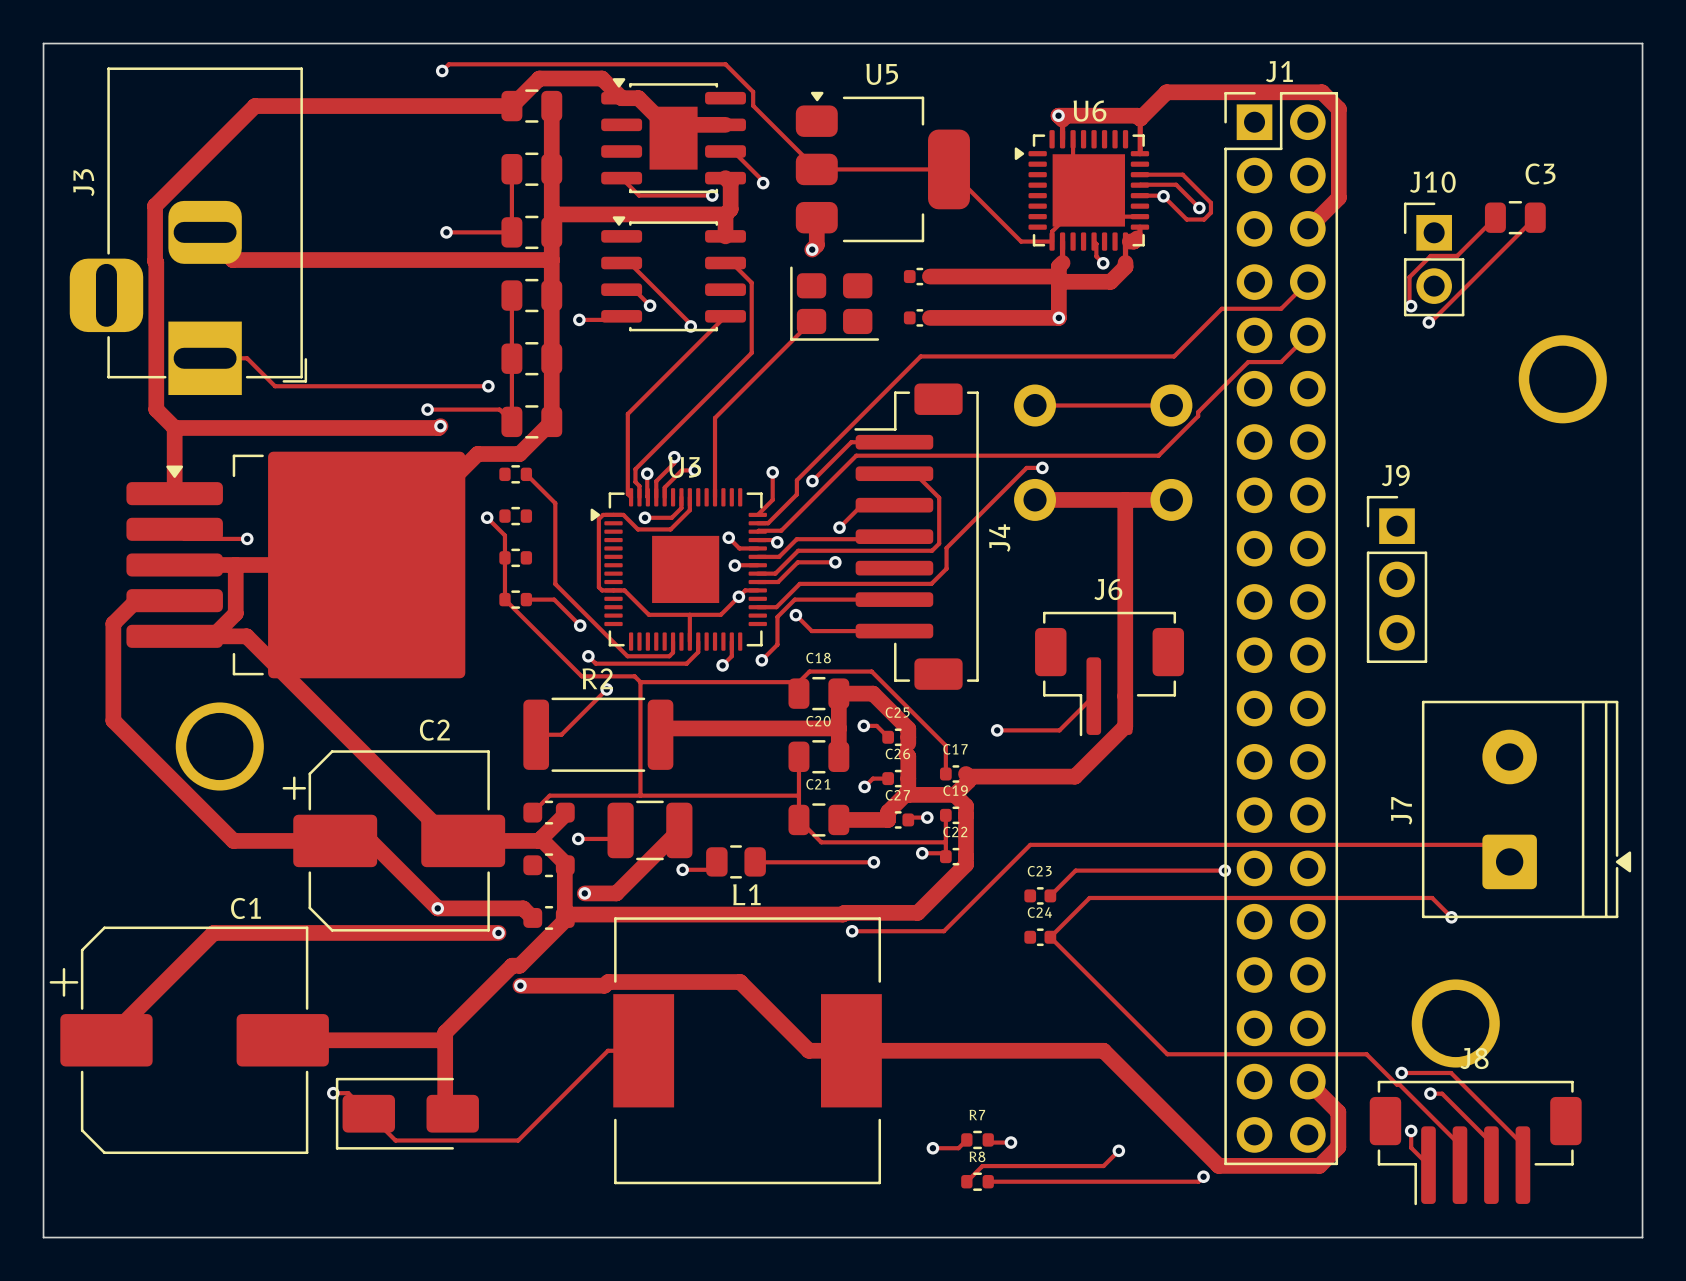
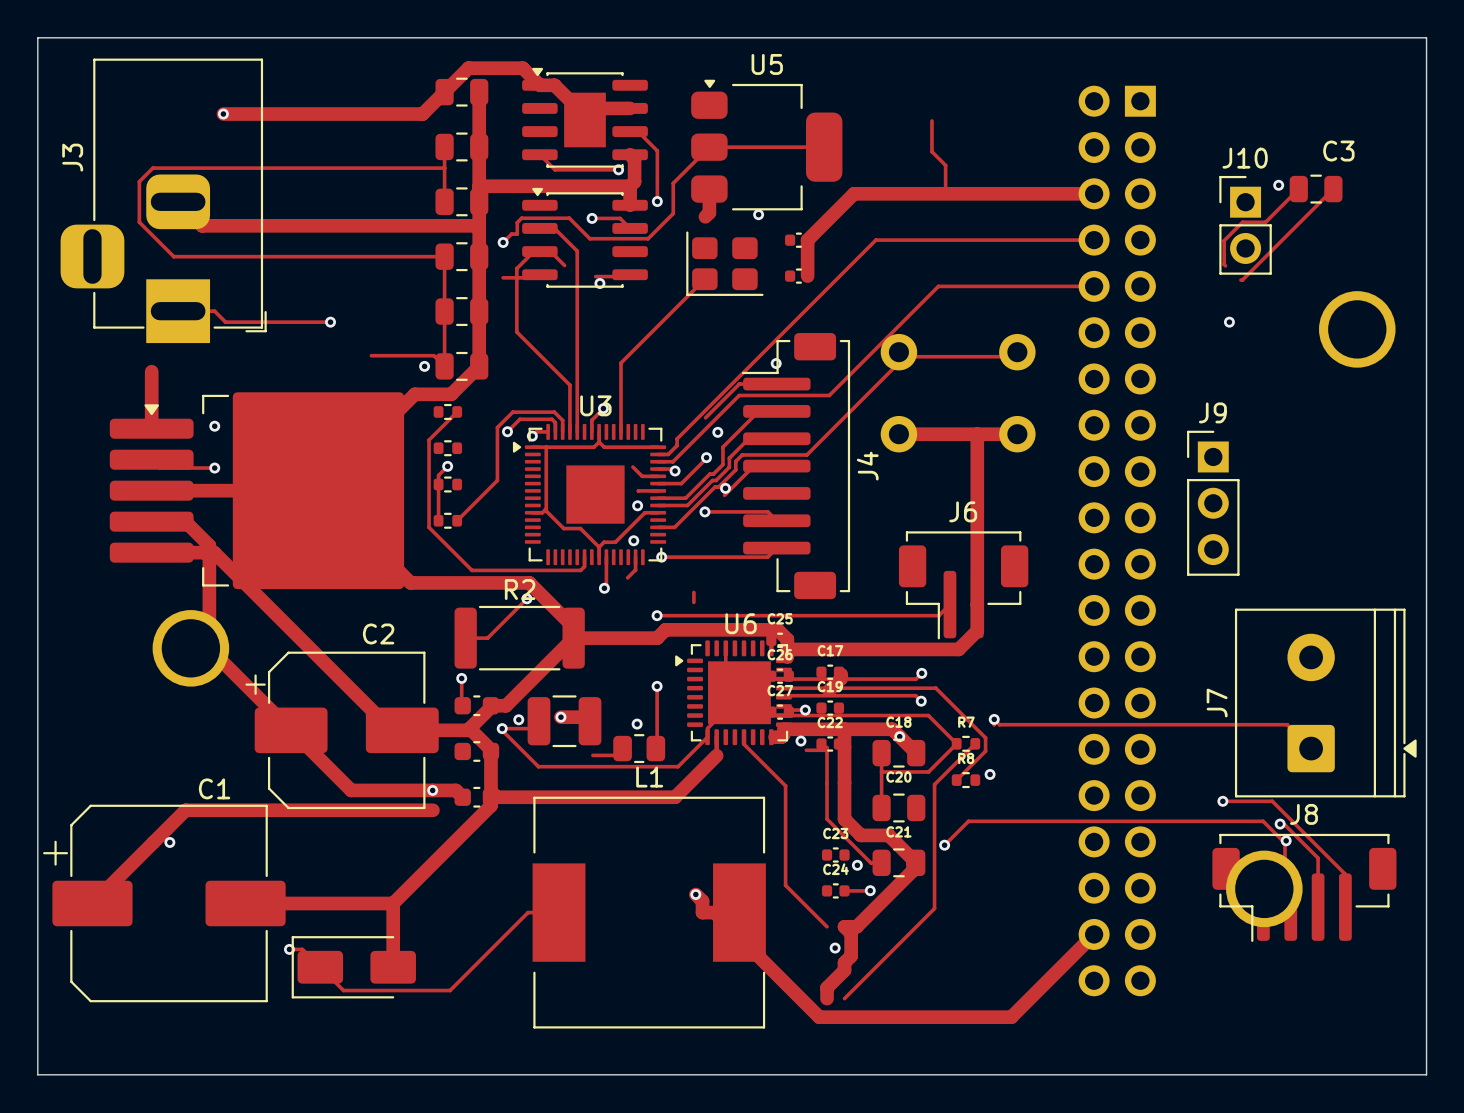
track: (442, 70) (448, 64) (725, 64) (753, 91) (753, 105) (816, 169) -> (503, 242) (511, 234) (517, 234) (517, 222) (521, 218) (569, 218) (589, 238) (648, 238) (673, 213) (673, 183) (709, 147)
via: (442, 70) -> none
track: (511, 106) (254, 106) (155, 205) (156, 409) (174, 427) (438, 427) (440, 426) -> (444, 92) (422, 114) (223, 114)
via: (1058, 115) -> none
track: (1140, 118) (1166, 92) (1322, 92) (1338, 109) (1338, 197) (1307, 228) -> none
track: (1140, 118) (1137, 115) (1058, 115) (1062, 119) (1062, 139) -> none
track: (1140, 118) (1140, 153) -> none
via: none -> (223, 114)
track: (733, 151) (763, 183) -> (636, 131) (657, 150) (657, 201)
track: (949, 169) (1021, 241) (1052, 241) (1052, 231) (1067, 216) (1139, 216) -> none
track: (1139, 174) (1182, 174) (1210, 202) (1210, 212) (1204, 219) (1186, 219) (1162, 195) (1139, 195) -> none
via: (763, 183) -> none
track: (1139, 185) (1176, 184) (1199, 207) -> none
U6 position: (1081, 190) -> (733, 692)
track: none -> (444, 168) (152, 168) (139, 181) (139, 222) (173, 256) (444, 256)
via: (1163, 196) -> none
via: (1199, 207) -> none
via: none -> (1278, 185)
track: (1139, 227) (1139, 235) (1137, 238) (1133, 241) (1125, 241) (1125, 266) (1110, 281) (1058, 281) -> none
track: (446, 232) (511, 232) -> none
via: (446, 232) -> none
via: none -> (657, 201)
track: (1062, 241) (1062, 262) (1058, 266) (1058, 317) (929, 317) -> (1094, 193) (854, 193) (807, 240) (807, 276)
track: (1094, 241) (1096, 243) (1096, 256) (1103, 263) -> none
via: none -> (758, 214)
via: (812, 249) -> none
via: none -> (592, 218)
track: (629, 263) (690, 324) (690, 326) -> (546, 228) (554, 228) (577, 251) (577, 423)
track: (725, 263) (731, 263) (751, 282) (751, 352) (635, 469) (635, 482) (639, 486) -> (630, 228) (620, 218) (592, 218)
via: (1103, 263) -> none
track: (929, 276) (1058, 276) -> none
via: none -> (503, 242)
track: (1307, 282) (1281, 308) (1221, 308) (1174, 356) (920, 356) (796, 480) (796, 494) (768, 523) -> (1094, 240) (875, 240) (677, 438) (677, 445) (667, 454)
via: (650, 305) -> none
via: (1411, 306) -> none
via: (1058, 317) -> none
track: (723, 318) (627, 414) (627, 494) (631, 497) -> (628, 276) (595, 276)
via: (579, 319) -> none
via: (1428, 322) -> none
track: (1307, 335) (1281, 362) (1248, 362) (1198, 412) (1198, 416) (1158, 455) (856, 455) (781, 530) (757, 531) -> (1094, 286) (938, 286) (829, 395) (739, 395) (672, 461) (658, 461)
track: (259, 370) (275, 386) (488, 386) -> (225, 322) (330, 322)
via: none -> (330, 322)
via: none -> (1229, 322)
via: (488, 386) -> none
track: (1035, 405) (1171, 405) -> none
via: (427, 409) -> none
via: none -> (776, 363)
via: none -> (424, 366)
via: (440, 426) -> none
track: (674, 457) (674, 463) (656, 481) -> (539, 251) (533, 251) (516, 268) (516, 332) (569, 385) (569, 417)
via: (674, 457) -> none
track: (1042, 467) (1026, 467) (946, 548) (946, 568) (931, 583) (799, 583) (776, 607) -> (1020, 356) (901, 356) (901, 360) (806, 454) (742, 454) (735, 461) (735, 469) (718, 486) (715, 486) (674, 527)
via: (1042, 467) -> none
track: (694, 470) (681, 470) (664, 487) -> none
track: (772, 472) (772, 499) (757, 514) -> none
via: (772, 472) -> none
track: (647, 473) (647, 497) -> none
via: (647, 473) -> none
track: (894, 473) (915, 473) (939, 497) (939, 543) (932, 550) (798, 550) (775, 573) -> (776, 411) (758, 411) (722, 447) (722, 464) (713, 474) (709, 474) (685, 498) (673, 498)
track: (526, 474) (555, 503) (555, 584) (627, 656) (669, 656) (673, 652) -> (457, 411) (429, 440) (429, 527) (472, 570) (580, 570) (584, 566)
via: (812, 481) -> none
track: none -> (555, 422) (551, 419) (519, 419) (507, 431)
via: none -> (214, 426)
via: none -> (507, 431)
track: none -> (548, 431) (536, 431) (532, 436)
track: (681, 497) (681, 508) (671, 517) (645, 517) -> (591, 431) (591, 420) (599, 412)
via: none -> (717, 432)
via: none -> (532, 436)
track: (689, 509) (670, 529) (637, 529) (623, 514) -> (658, 447) (604, 447) (599, 442) (594, 447) (541, 447)
track: (613, 514) (603, 514) (598, 519) (598, 587) (602, 590) (613, 590) -> none
track: none -> (546, 447) (546, 508) (542, 512)
track: (487, 517) (504, 535) (504, 547) -> (447, 466) (438, 475)
via position: (487, 517) -> (447, 466)
via: (645, 517) -> none
track: none -> (706, 457) (681, 483) (676, 483)
via: none -> (706, 457)
via: (839, 527) -> none
track: (894, 536) (891, 539) (796, 539) (779, 556) -> (776, 466) (753, 466) (724, 495)
via: (728, 537) -> none
track: (835, 562) (797, 562) (778, 582) -> (729, 458) (729, 467) (716, 480) (712, 480) (687, 505) (675, 505)
track: (235, 564) (235, 613) (212, 636) -> none
track: none -> (318, 490) (410, 582) (529, 582) (573, 627) (573, 638)
via: (734, 565) -> none
via: none -> (637, 505)
via: none -> (704, 511)
track: (624, 590) (648, 614) (720, 614) (745, 590) -> (545, 510) (563, 528) (580, 528) (599, 547) (604, 542) (615, 542) (644, 512) (647, 512)
via: (738, 596) -> none
track: (504, 599) (581, 676) (634, 676) (640, 682) -> none
track: (526, 599) (554, 599) (580, 625) -> (457, 520) (497, 480) (497, 427) (512, 412) (554, 412) (562, 420) (562, 431)
track: (894, 599) (794, 599) (777, 616) (777, 644) (761, 660) -> (776, 520) (767, 511) (704, 511)
track: (174, 600) (136, 600) (113, 623) (113, 720) (233, 840) (370, 840) (437, 908) (523, 908) (524, 910) -> (151, 521) (185, 521) (209, 545) (209, 648) (351, 790) (455, 790)
track: (689, 614) (689, 630) -> none
track: (795, 615) (811, 631) (894, 631) -> (661, 557) (767, 557) (776, 548)
via: (795, 615) -> none
via: none -> (633, 540)
via: (580, 625) -> none
J1 side: top (1281, 628) -> bottom (1117, 540)
track: (698, 652) (686, 663) (595, 663) (588, 656) -> (606, 566) (606, 586) (604, 588)
via: (588, 656) -> none
via position: (761, 660) -> (661, 557)
via: (722, 665) -> none
via: none -> (604, 588)
track: (640, 682) (640, 795) -> none
track: (640, 682) (798, 682) (809, 671) (871, 671) (945, 745) (945, 773) -> none
C18 position: (818, 693) -> (898, 753)
via: none -> (657, 615)
track: (1081, 708) (1059, 730) (997, 730) -> (938, 615) (657, 615)
track: (863, 725) (876, 725) (888, 737) -> none
via: (863, 725) -> none
track: (838, 728) (666, 728) (660, 734) -> (787, 657) (787, 639) (777, 629) (665, 629) (657, 638) (573, 638)
via: (997, 730) -> none
track: none -> (573, 638) (506, 705) (490, 705)
track: none -> (725, 648) (725, 679) (762, 715) (928, 715) (956, 743) (928, 771) (881, 771)
track: (1103, 747) (1075, 776) (968, 776) (965, 773) -> (958, 649) (787, 649)
track: (798, 756) (798, 819) (821, 842) (945, 842) -> none
C20 position: (818, 756) -> (898, 807)
track: (838, 756) (838, 693) (873, 693) (908, 728) (908, 743) (906, 745) (906, 754) (908, 756) (908, 794) -> none
track: none -> (921, 673) (916, 679) (783, 679)
via: none -> (921, 673)
track: (888, 778) (872, 778) (864, 786) -> none
via: none -> (461, 678)
via: (864, 786) -> none
via: none -> (657, 686)
track: none -> (783, 688) (935, 688) (985, 737) (985, 751) (956, 780)
track: (798, 795) (549, 795) (532, 812) -> (461, 678) (462, 705)
track: none -> (739, 692) (739, 696) (707, 728) (707, 737) (678, 766) (538, 766) (501, 730)
track: none -> (783, 697) (785, 695) (915, 695) (921, 701)
via: none -> (921, 701)
track: (945, 815) (945, 856) (942, 853) (922, 853) -> none
C21 position: (818, 819) -> (898, 862)
track: (838, 819) (888, 819) (888, 811) (905, 794) (954, 794) (965, 806) (965, 864) (917, 912) (844, 912) (842, 914) (568, 914) (564, 910) (565, 865) -> (716, 737) (716, 755) (675, 797) (490, 797) (490, 751)
via: none -> (560, 717)
via: none -> (518, 719)
via: none -> (994, 719)
track: (679, 830) (616, 893) (584, 893) -> (590, 721) (585, 717) (560, 717)
via: none -> (637, 724)
track: none -> (783, 724) (783, 734) (781, 737) (771, 737)
track: none -> (783, 729) (892, 729) (916, 753)
track: none -> (844, 729) (844, 819) (860, 835) (888, 835) (913, 859) (913, 870) (856, 926) (844, 926) (851, 933) (851, 956) (844, 962) (844, 970) (827, 987) (827, 998)
track: (1492, 844) (1030, 844) (943, 931) (852, 931) -> (1296, 733) (1287, 724) (999, 724) (994, 719) (994, 724)
track: none -> (744, 737) (744, 744) (785, 785) (785, 885) (827, 926)
via: none -> (899, 736)
track: none -> (975, 743) (934, 784) (934, 908) (844, 998)
track: none -> (827, 747) (827, 819) (870, 862) (881, 862)
track: (755, 861) (873, 862) -> (655, 748) (657, 686)
via: (873, 862) -> none
track: none -> (806, 750) (827, 750)
track: none -> (881, 753) (881, 807)
via: (682, 869) -> none
track: (1224, 870) (1075, 870) (1050, 895) -> none
via: (1224, 870) -> none
via: none -> (990, 774)
via: (584, 893) -> none
C23 position: (1040, 895) -> (835, 855)
via: (437, 908) -> none
track: (1451, 917) (1432, 897) (1089, 897) (1050, 937) (1167, 1054) (1366, 1054) (1459, 1145) (1459, 1165) -> none
via: (1451, 917) -> none
track: (565, 920) (519, 965) (512, 965) (445, 1032) (445, 1106) (452, 1113) -> (490, 799) (490, 805) (393, 903)
track: none -> (1222, 801) (1272, 801) (1345, 874) (1345, 907)
via: none -> (1222, 801)
via: (852, 931) -> none
via position: (498, 932) -> (432, 790)
C24 position: (1040, 937) -> (835, 890)
track: none -> (1280, 824) (1283, 824) (1318, 858) (1318, 907)
via: none -> (1280, 824)
via: none -> (1286, 840)
via: none -> (169, 842)
track: none -> (944, 845) (968, 821) (1263, 821) (1282, 840) (1286, 840) (1284, 901) (1290, 907)
via: none -> (944, 845)
track: (520, 985) (604, 985) (608, 982) (740, 982) (808, 1050) -> (695, 894) (702, 901) (702, 912)
via: (520, 985) -> none
via: none -> (857, 865)
track: none -> (844, 890) (870, 890)
via: none -> (870, 890)
via: none -> (695, 894)
track: none -> (393, 903) (393, 967)
track: none -> (717, 912) (717, 914) (819, 1017) (1011, 1017) (1094, 934)
track: (851, 1050) (1103, 1050) (1218, 1165) (1319, 1165) (1338, 1147) (1338, 1112) (1307, 1081) -> none
track: (1401, 1072) (1451, 1072) (1522, 1144) (1522, 1165) -> none
via: (1401, 1072) -> none
via: none -> (835, 948)
track: (1430, 1093) (1442, 1093) (1491, 1143) (1491, 1165) -> none
via: (1430, 1093) -> none
track: (1411, 1130) (1411, 1147) (1428, 1165) -> none
via: (1411, 1130) -> none
track: (966, 1139) (958, 1148) (932, 1148) -> none
R7 position: (977, 1139) -> (965, 743)
track: (988, 1139) (990, 1142) (1010, 1142) -> none
via: (1010, 1142) -> none
J8 position: (1475, 1143) -> (1304, 887)
via: (932, 1148) -> none
track: (1118, 1150) (1103, 1166) (982, 1166) (966, 1181) -> none
via: (1118, 1150) -> none
track: (1203, 1176) (1198, 1181) (988, 1181) -> none
via: (1203, 1176) -> none
R8 position: (977, 1181) -> (965, 780)

